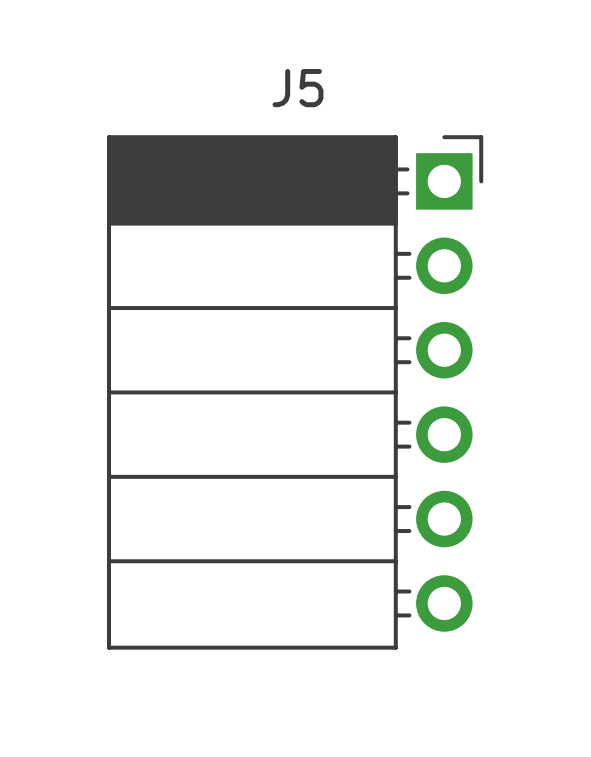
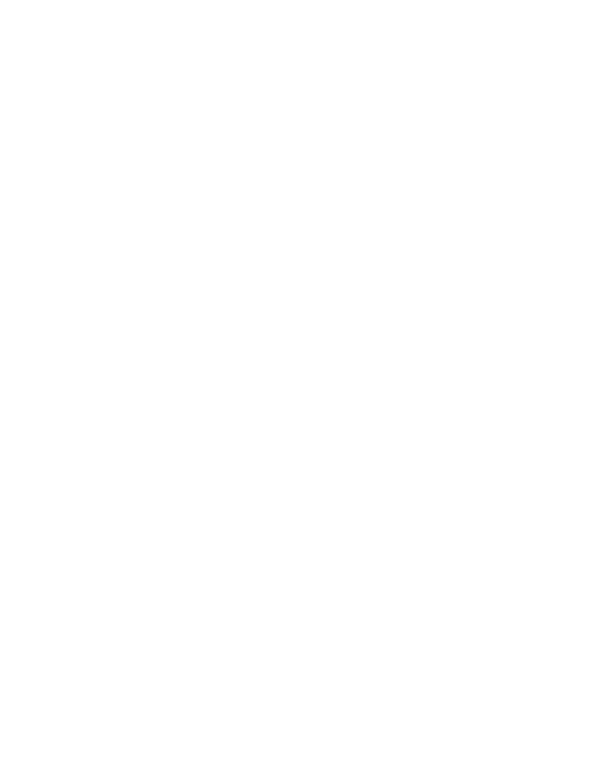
J5: (295, 392) -> none

